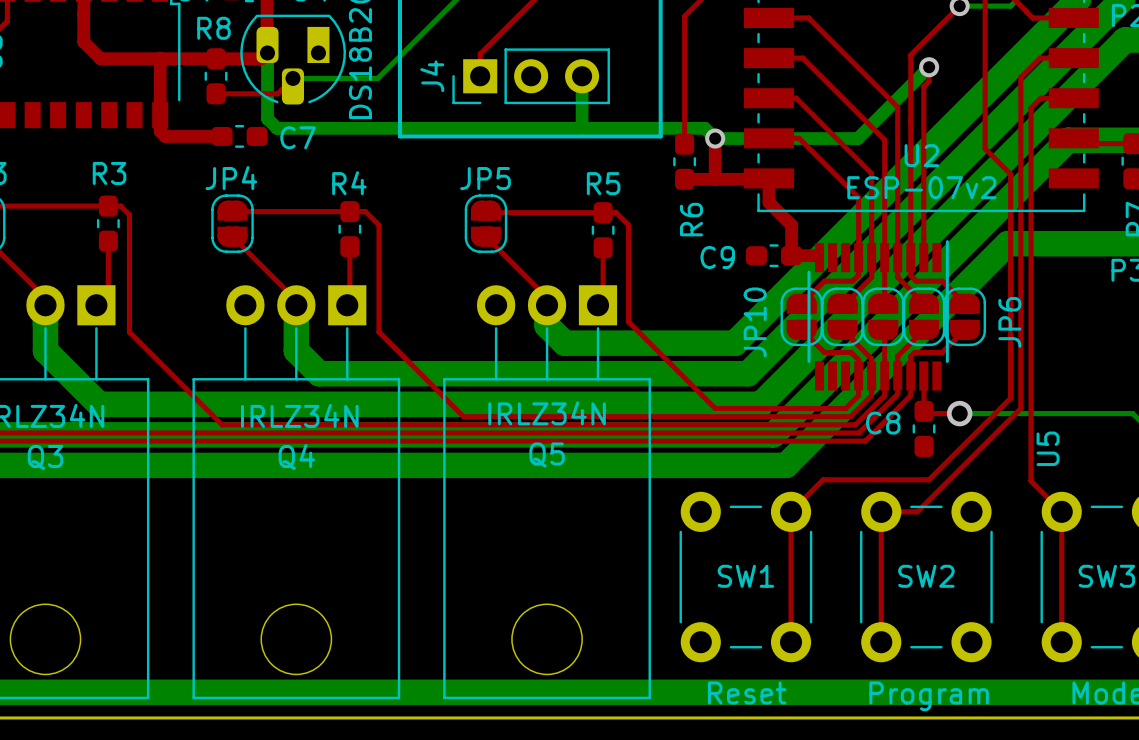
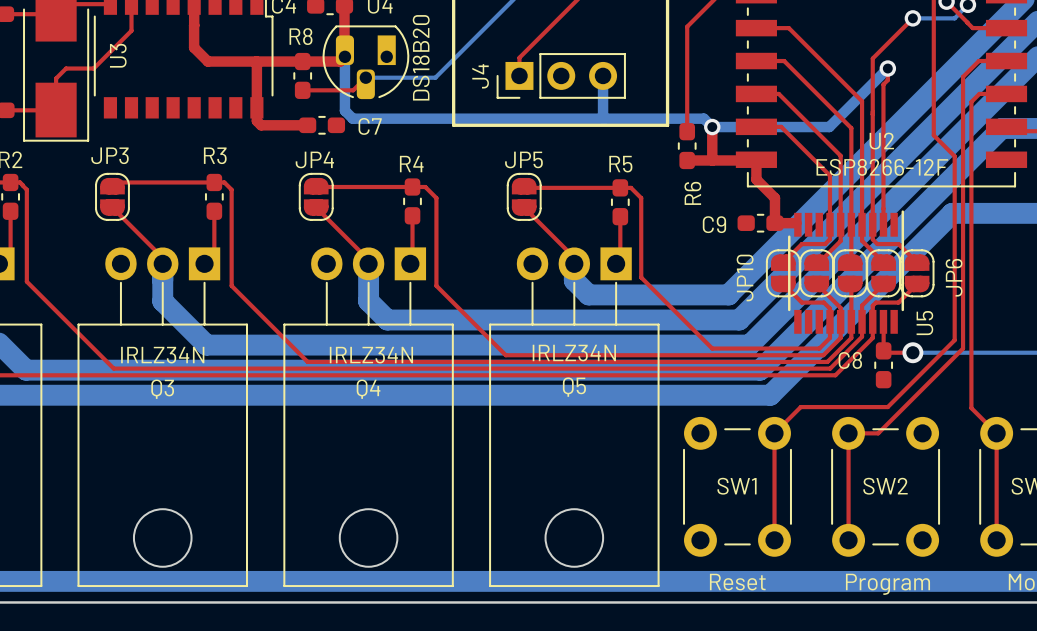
U2 value: ESP-07v2 (921, 187) -> ESP8266-12F (882, 167)
U5 name position: U5 (1048, 448) -> U5 (924, 323)

